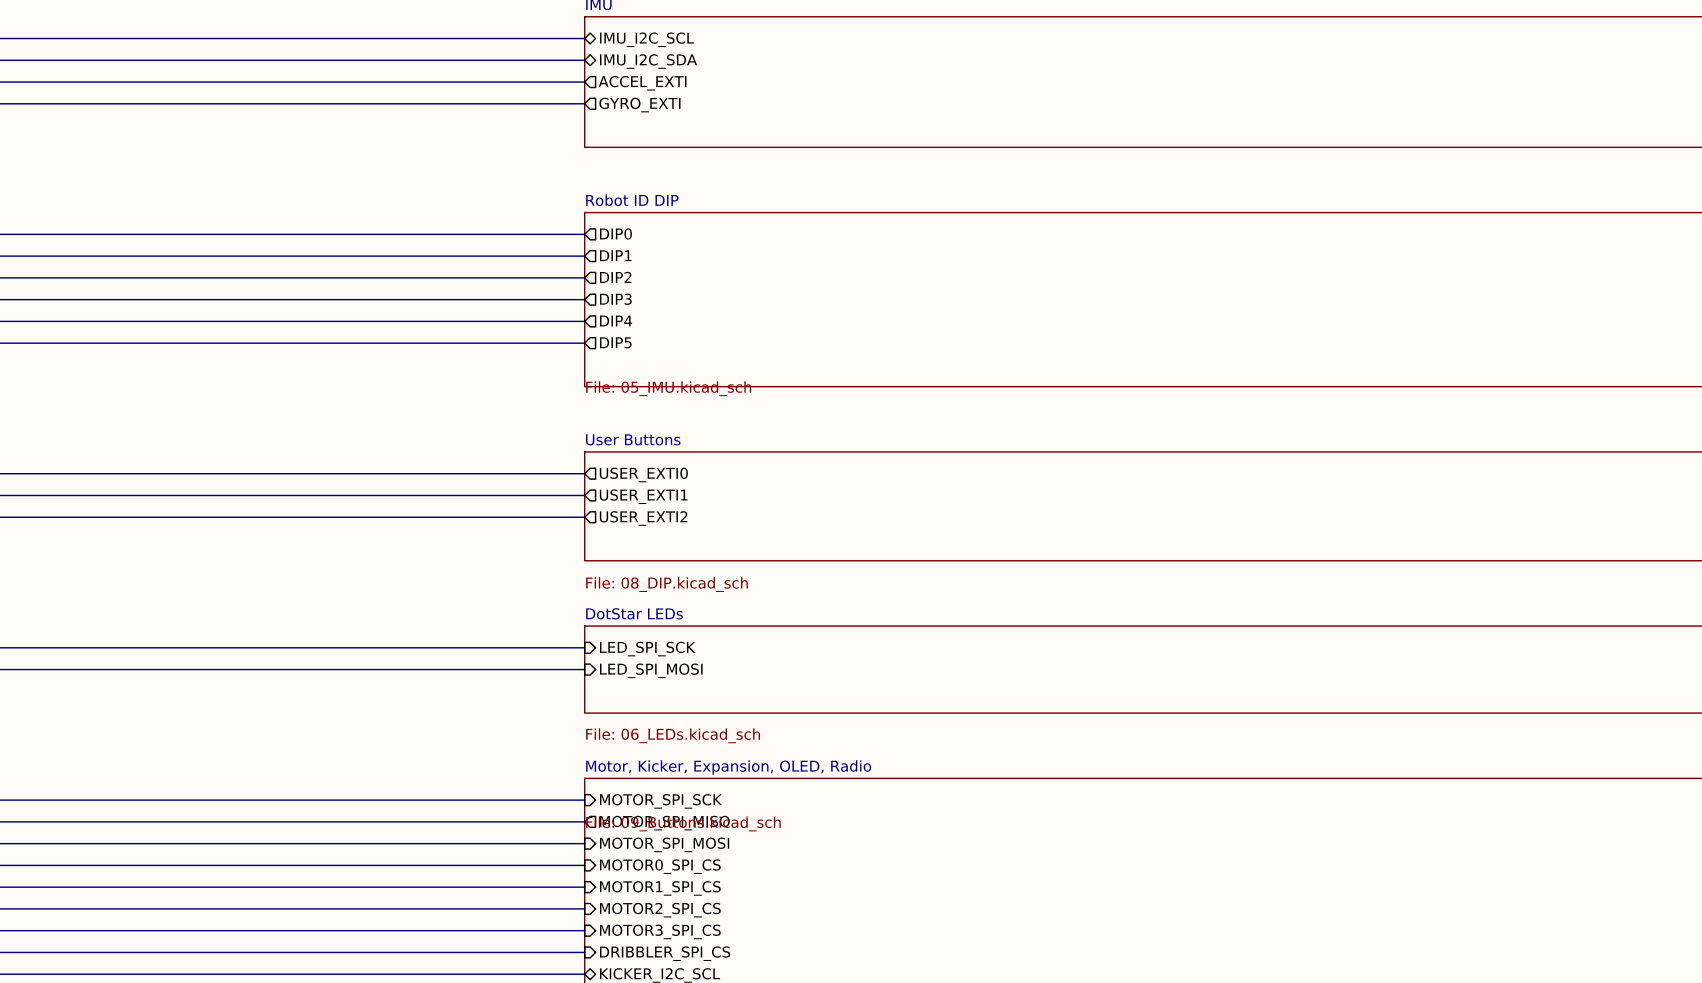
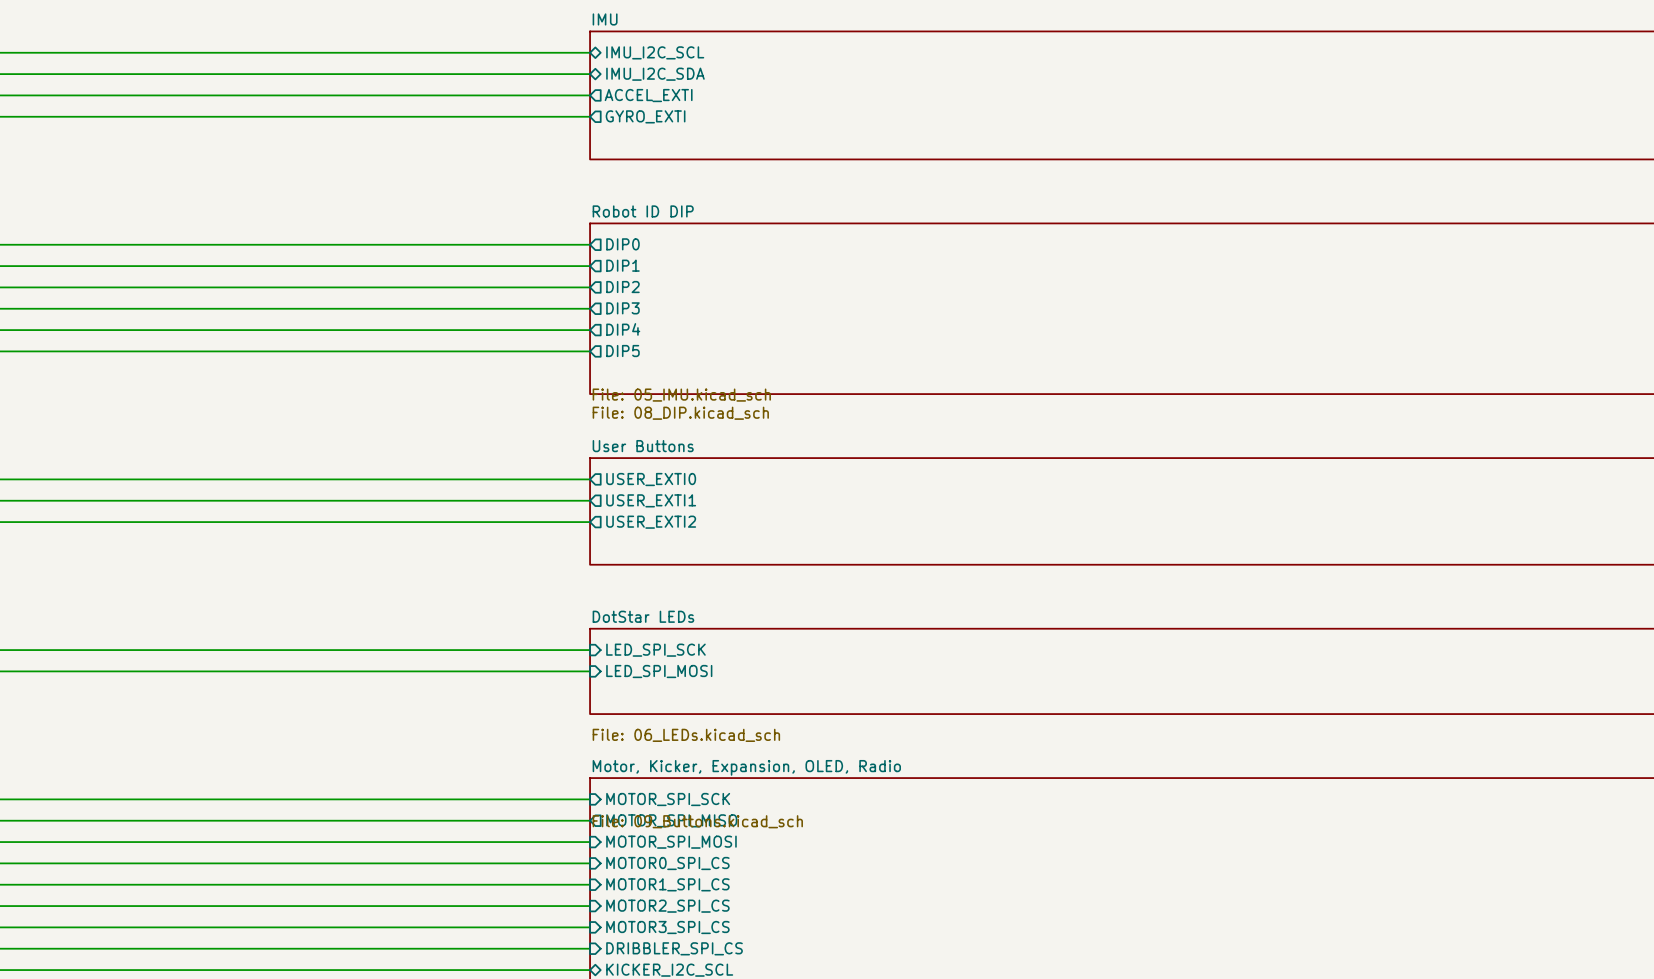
sheet Robot ID DIP value position: File: 08_DIP.kicad_sch (667, 584) -> File: 08_DIP.kicad_sch (680, 413)

